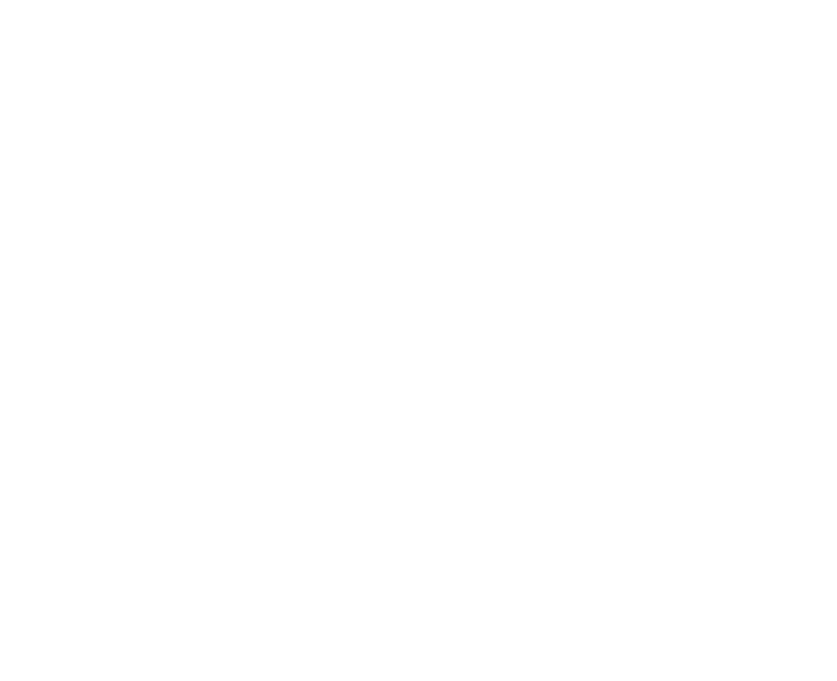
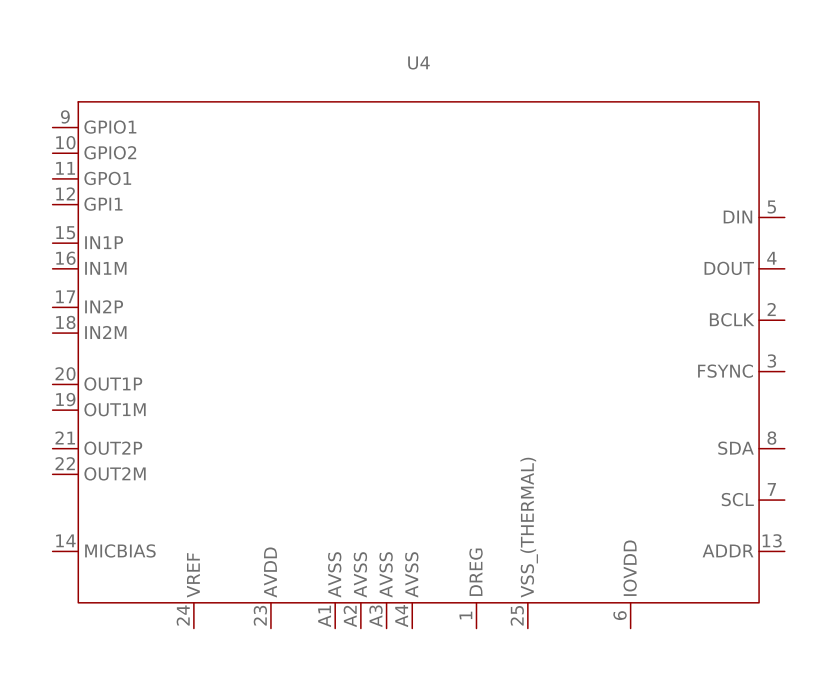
U4: none -> (418, 365)

